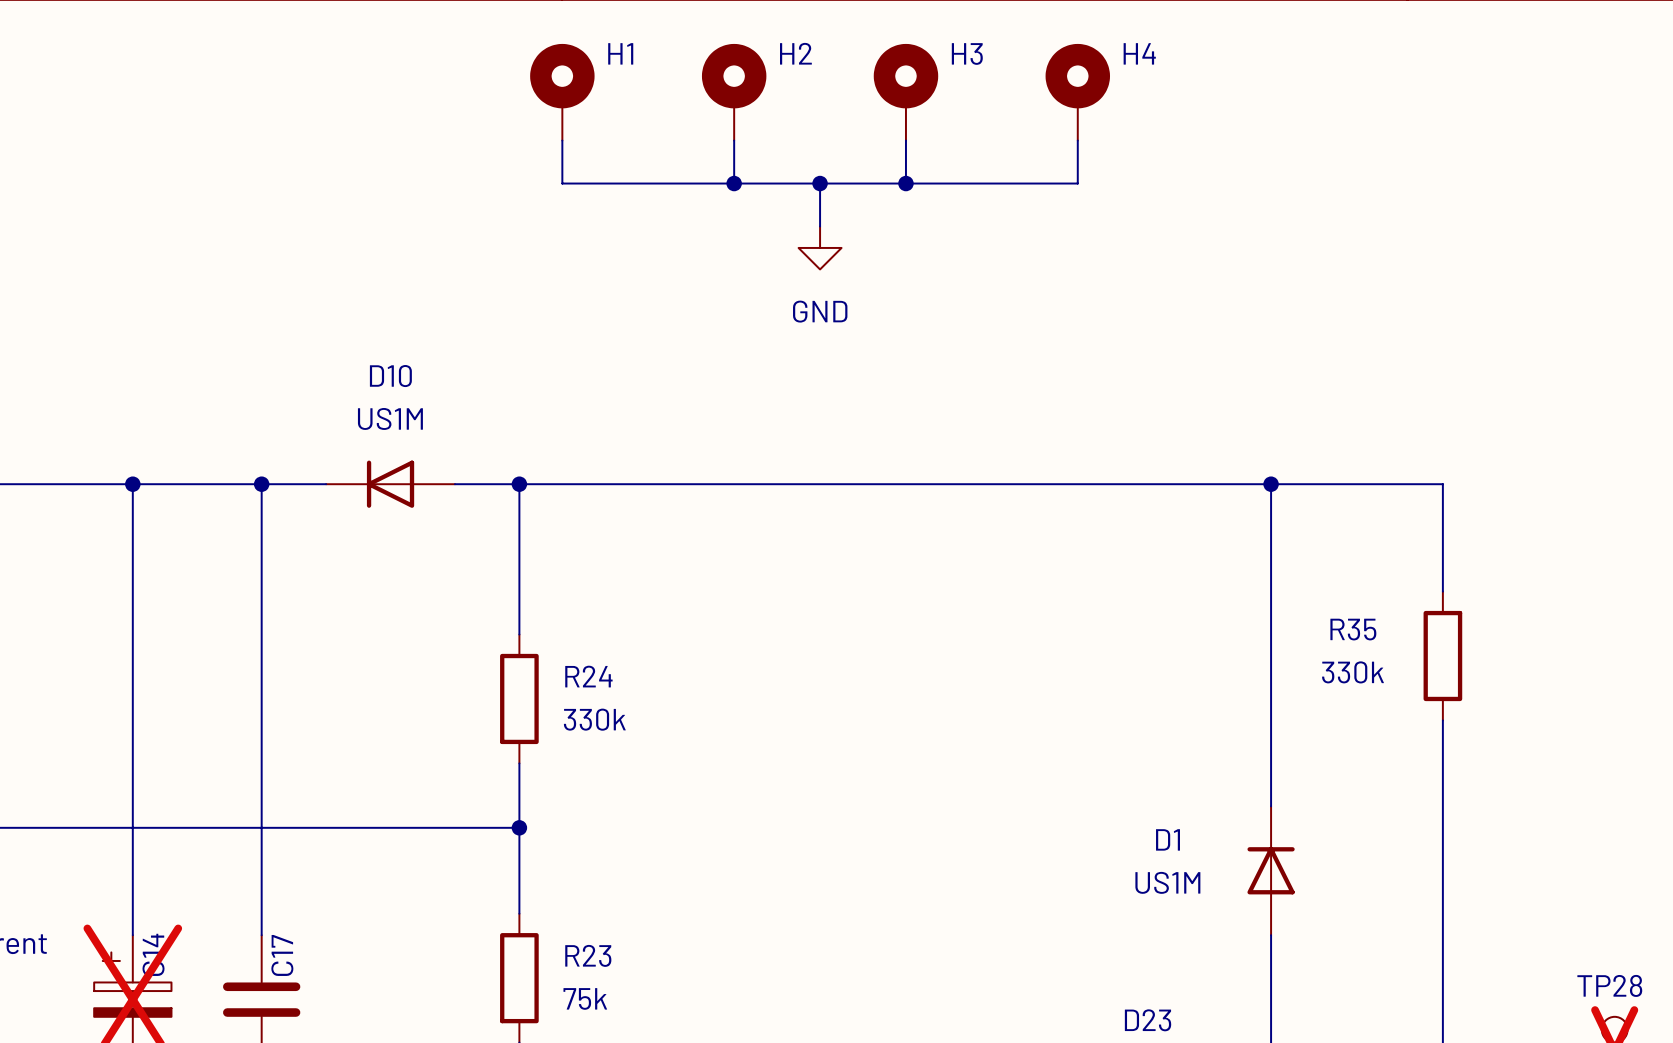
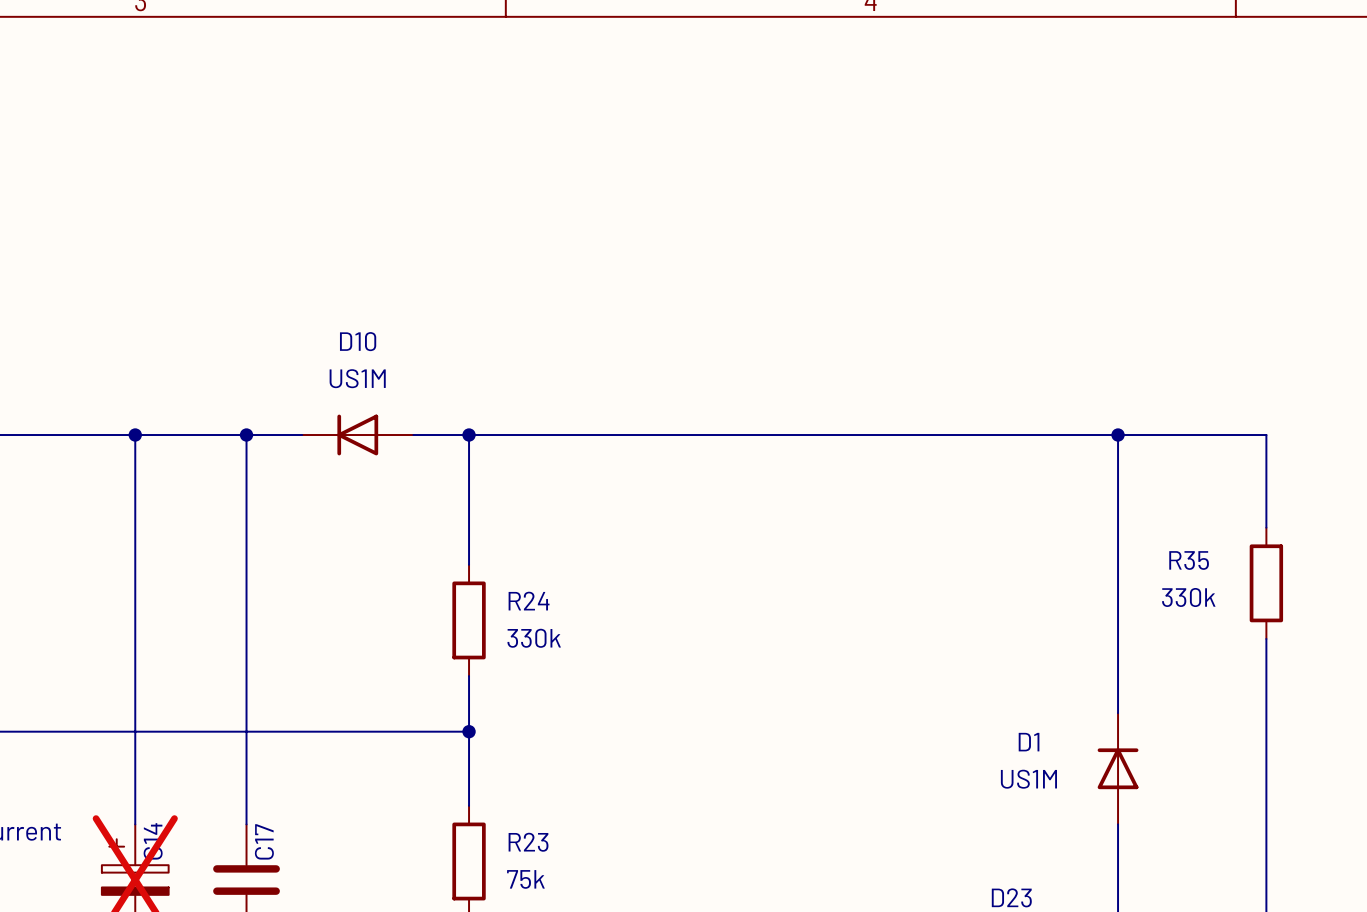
H1: (562, 92) -> none
H2: (734, 92) -> none
H3: (905, 92) -> none
H4: (1077, 92) -> none
wire: (562, 140) (562, 183) (1077, 183) (1077, 140) -> none
wire: (734, 140) (734, 183) -> none
wire: (905, 140) (905, 183) -> none
junction: (734, 183) -> none
wire: (820, 183) (820, 226) -> none
junction: (820, 183) -> none
junction: (905, 183) -> none
power symbol: GND (820, 247) -> none

